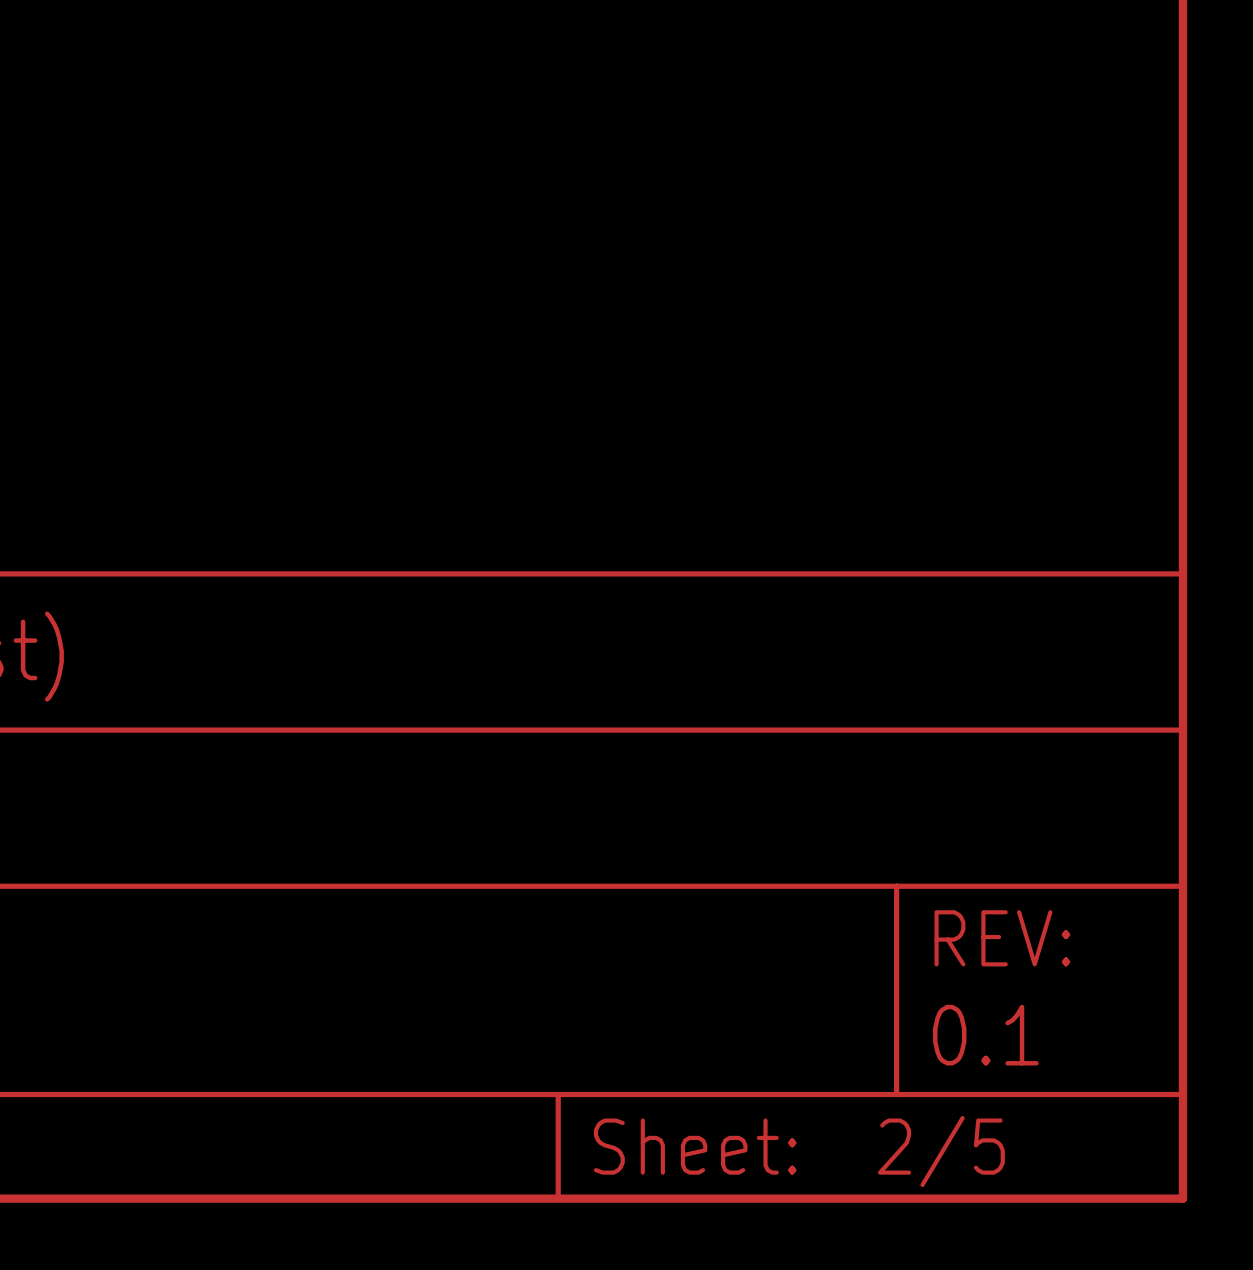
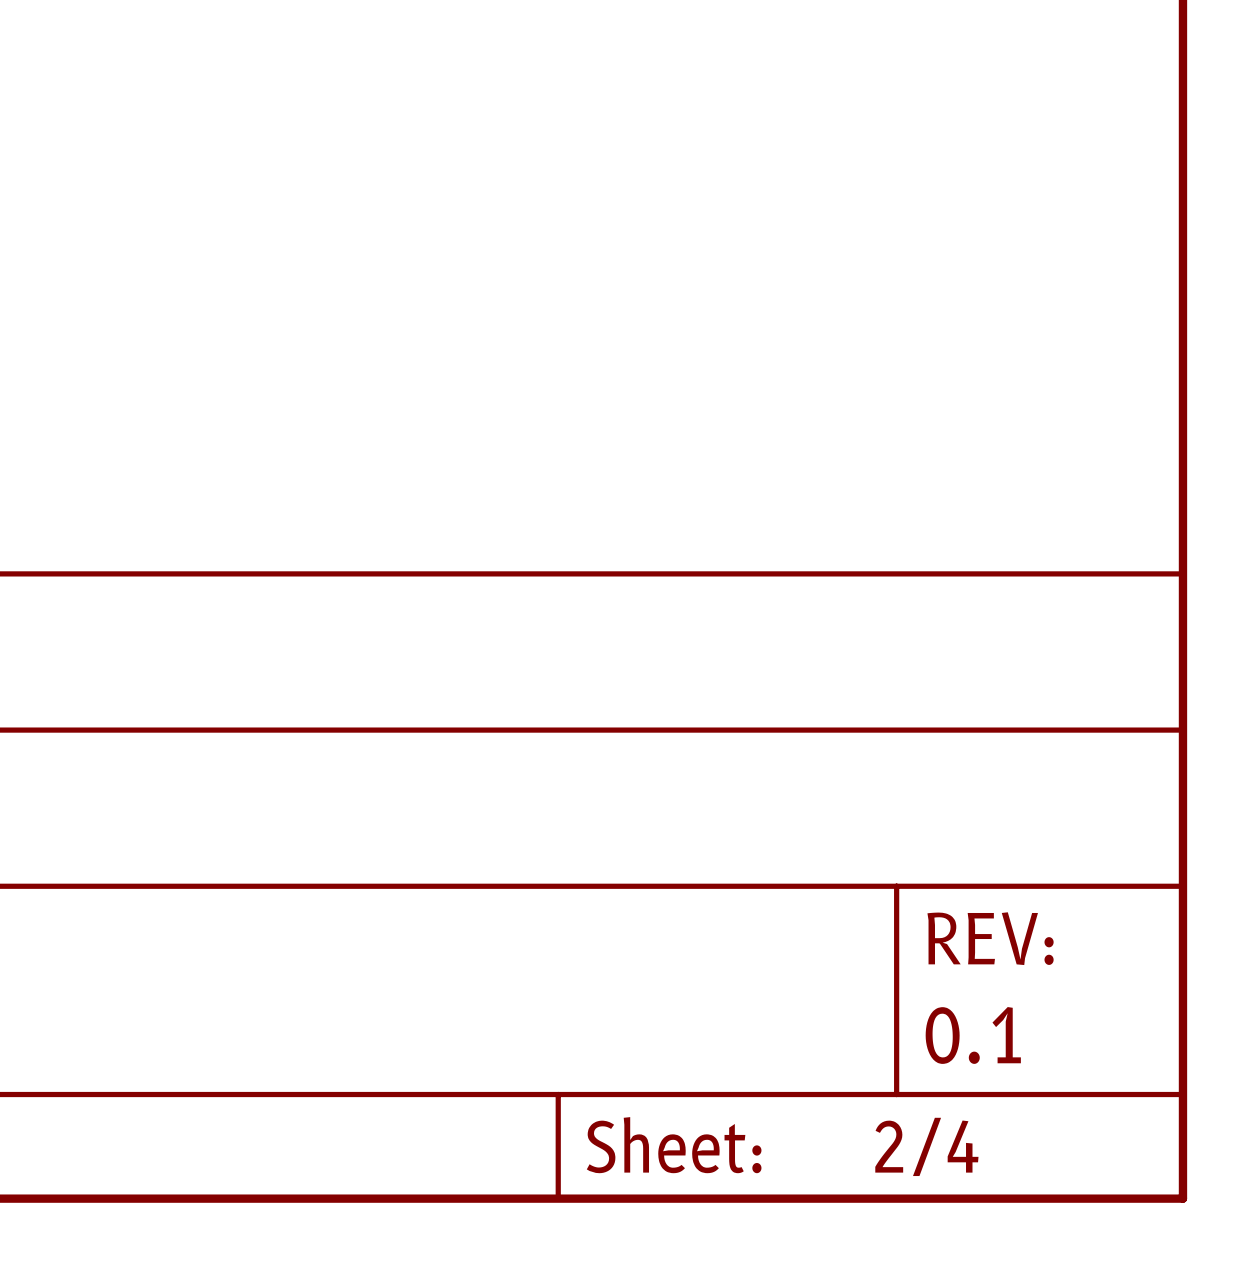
part text: 2/5 (941, 1151) -> 2/4 (926, 1146)

